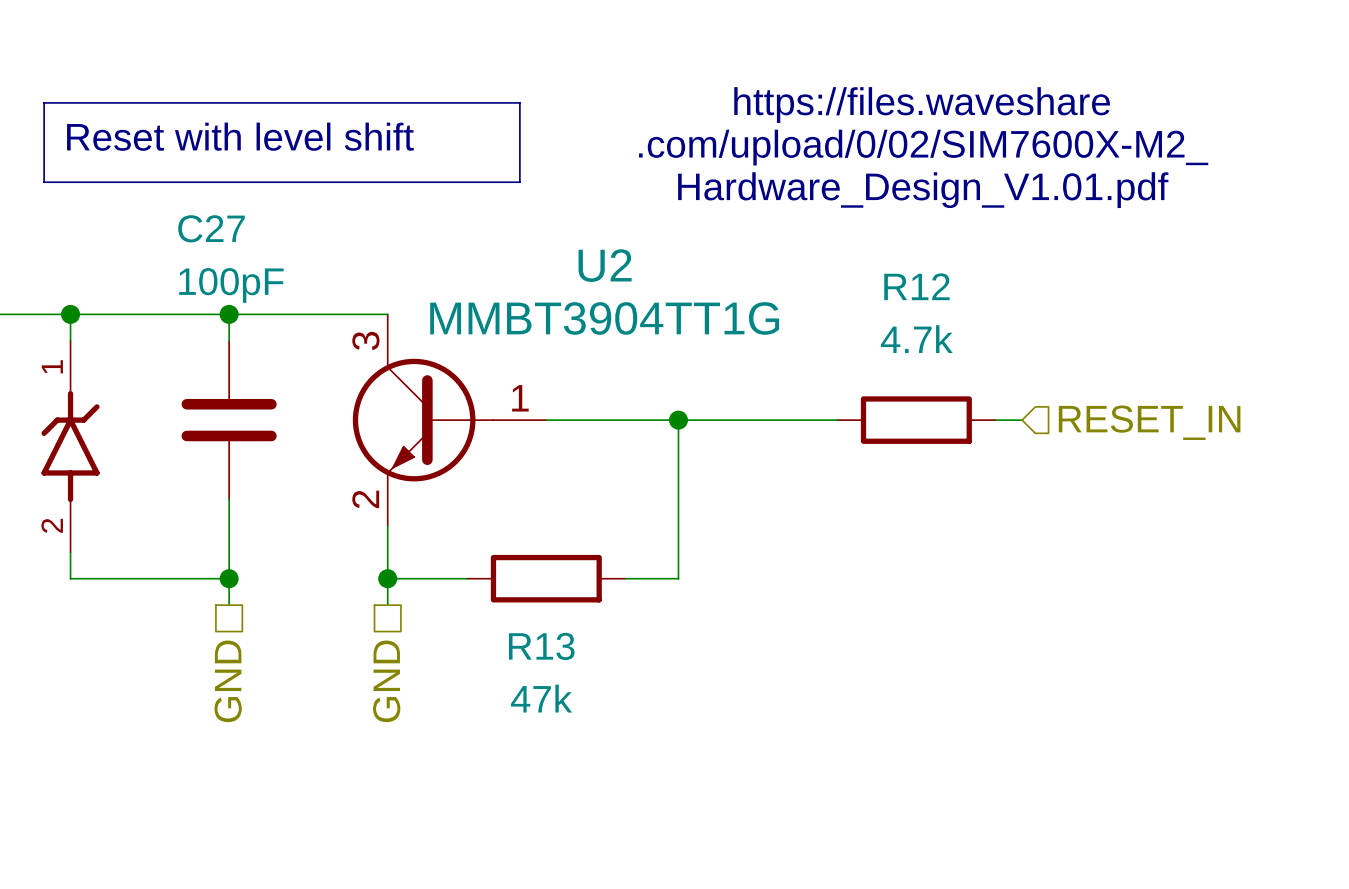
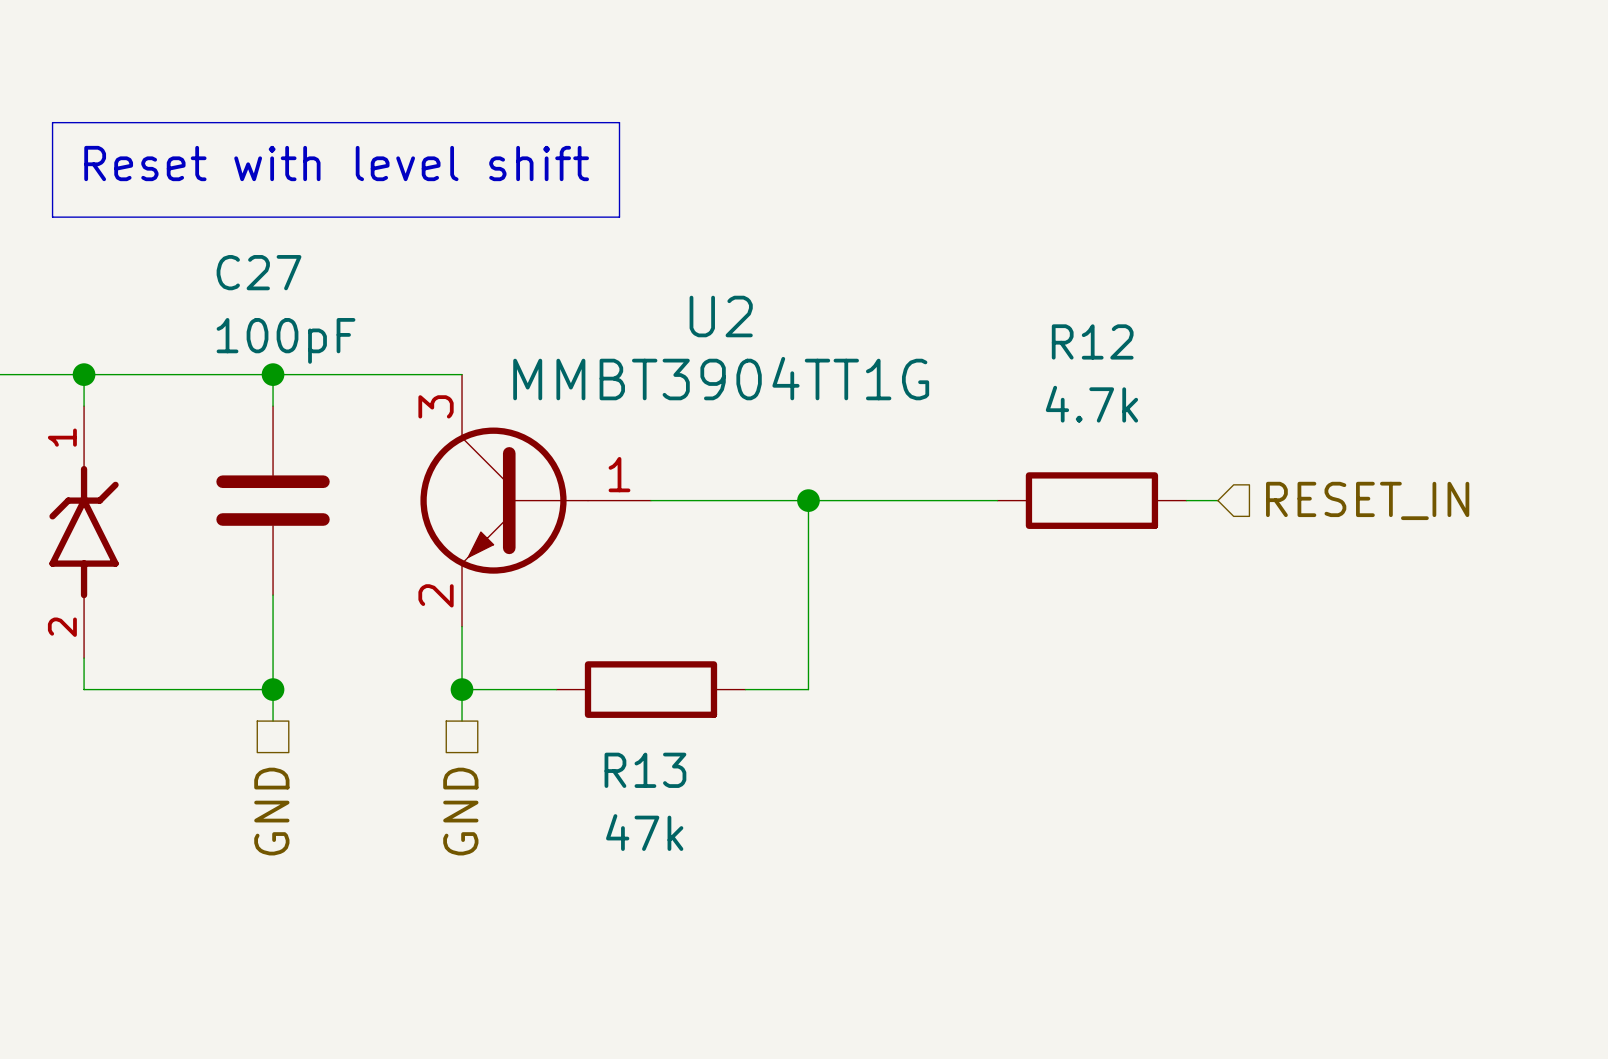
text: https://files.waveshare (922, 105) -> none
text: .com/upload/0/02/SIM7600X-M2_ (923, 147) -> none
text: Hardware_Design_V1.01.pdf (923, 190) -> none

